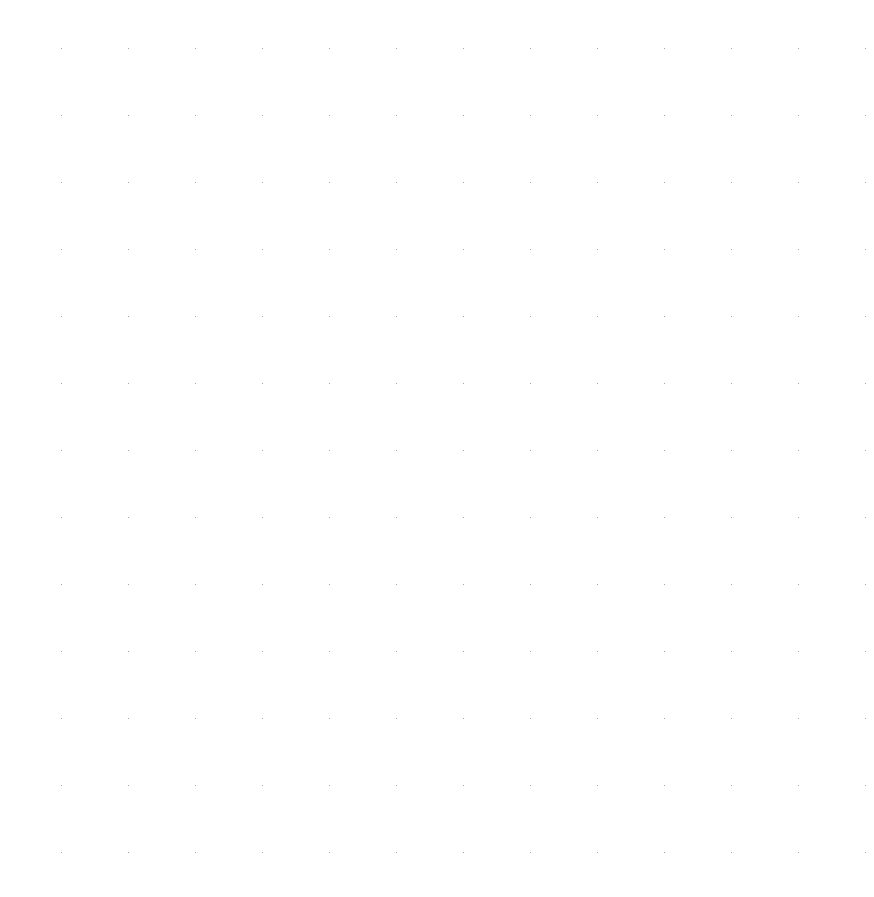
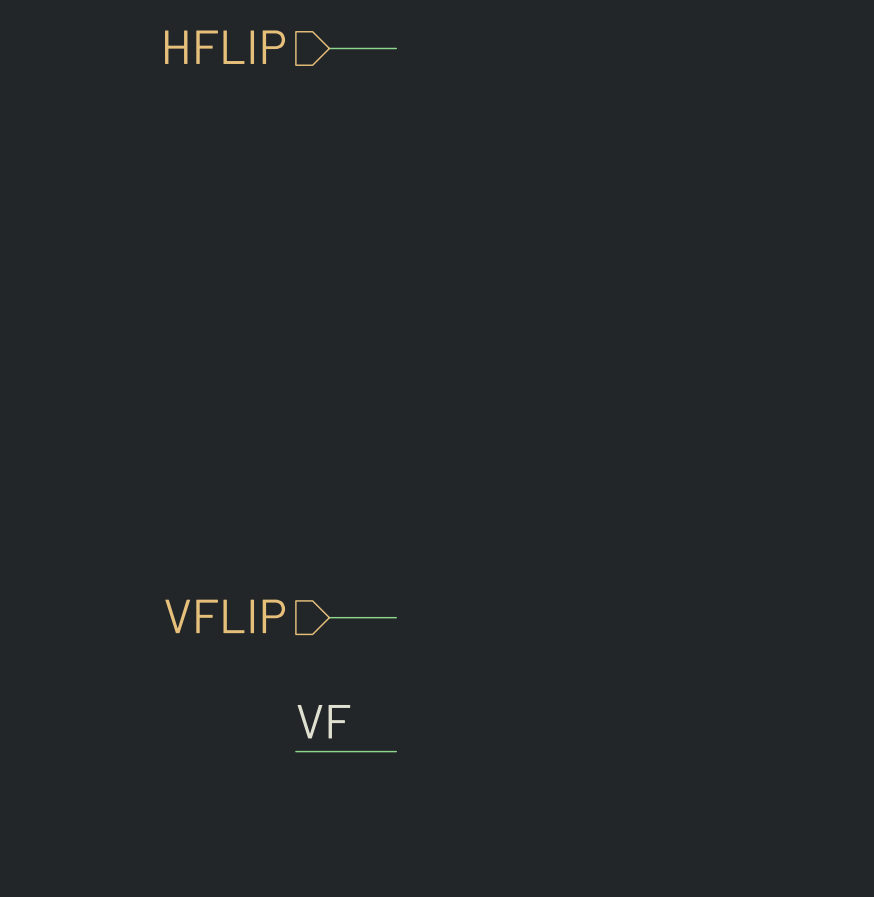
hierarchical label: none -> HFLIP (225, 47)
wire: none -> (329, 48) (396, 48)
hierarchical label: none -> VFLIP (225, 616)
wire: none -> (329, 617) (396, 617)
label: none -> VF (323, 721)
wire: none -> (295, 751) (396, 751)

